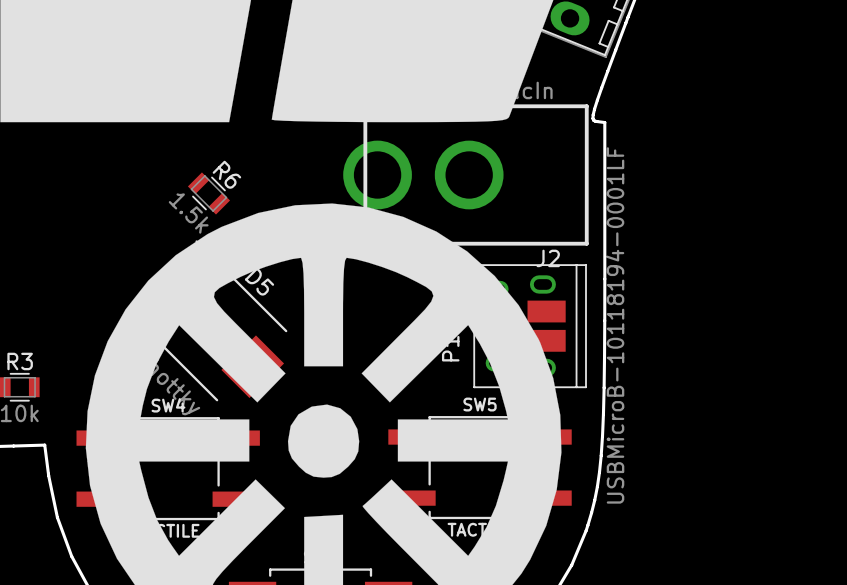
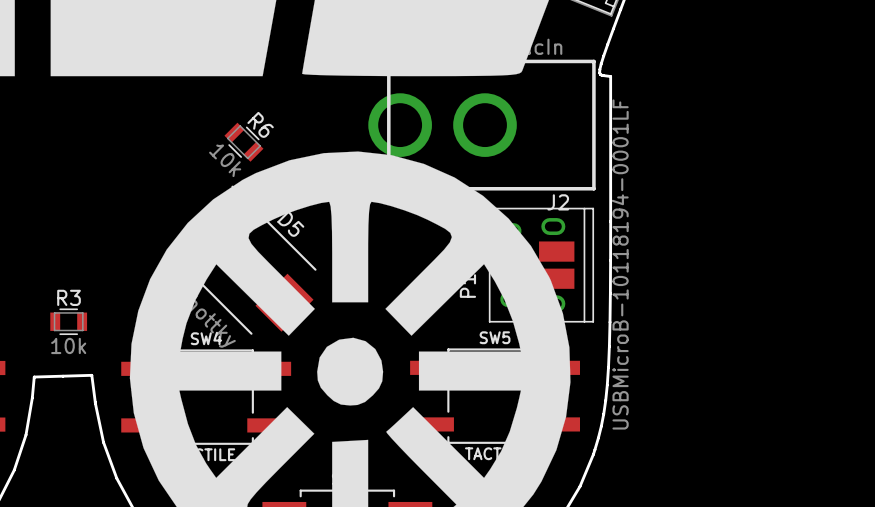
R6 value: 1.5k (188, 213) -> 10k (225, 160)

